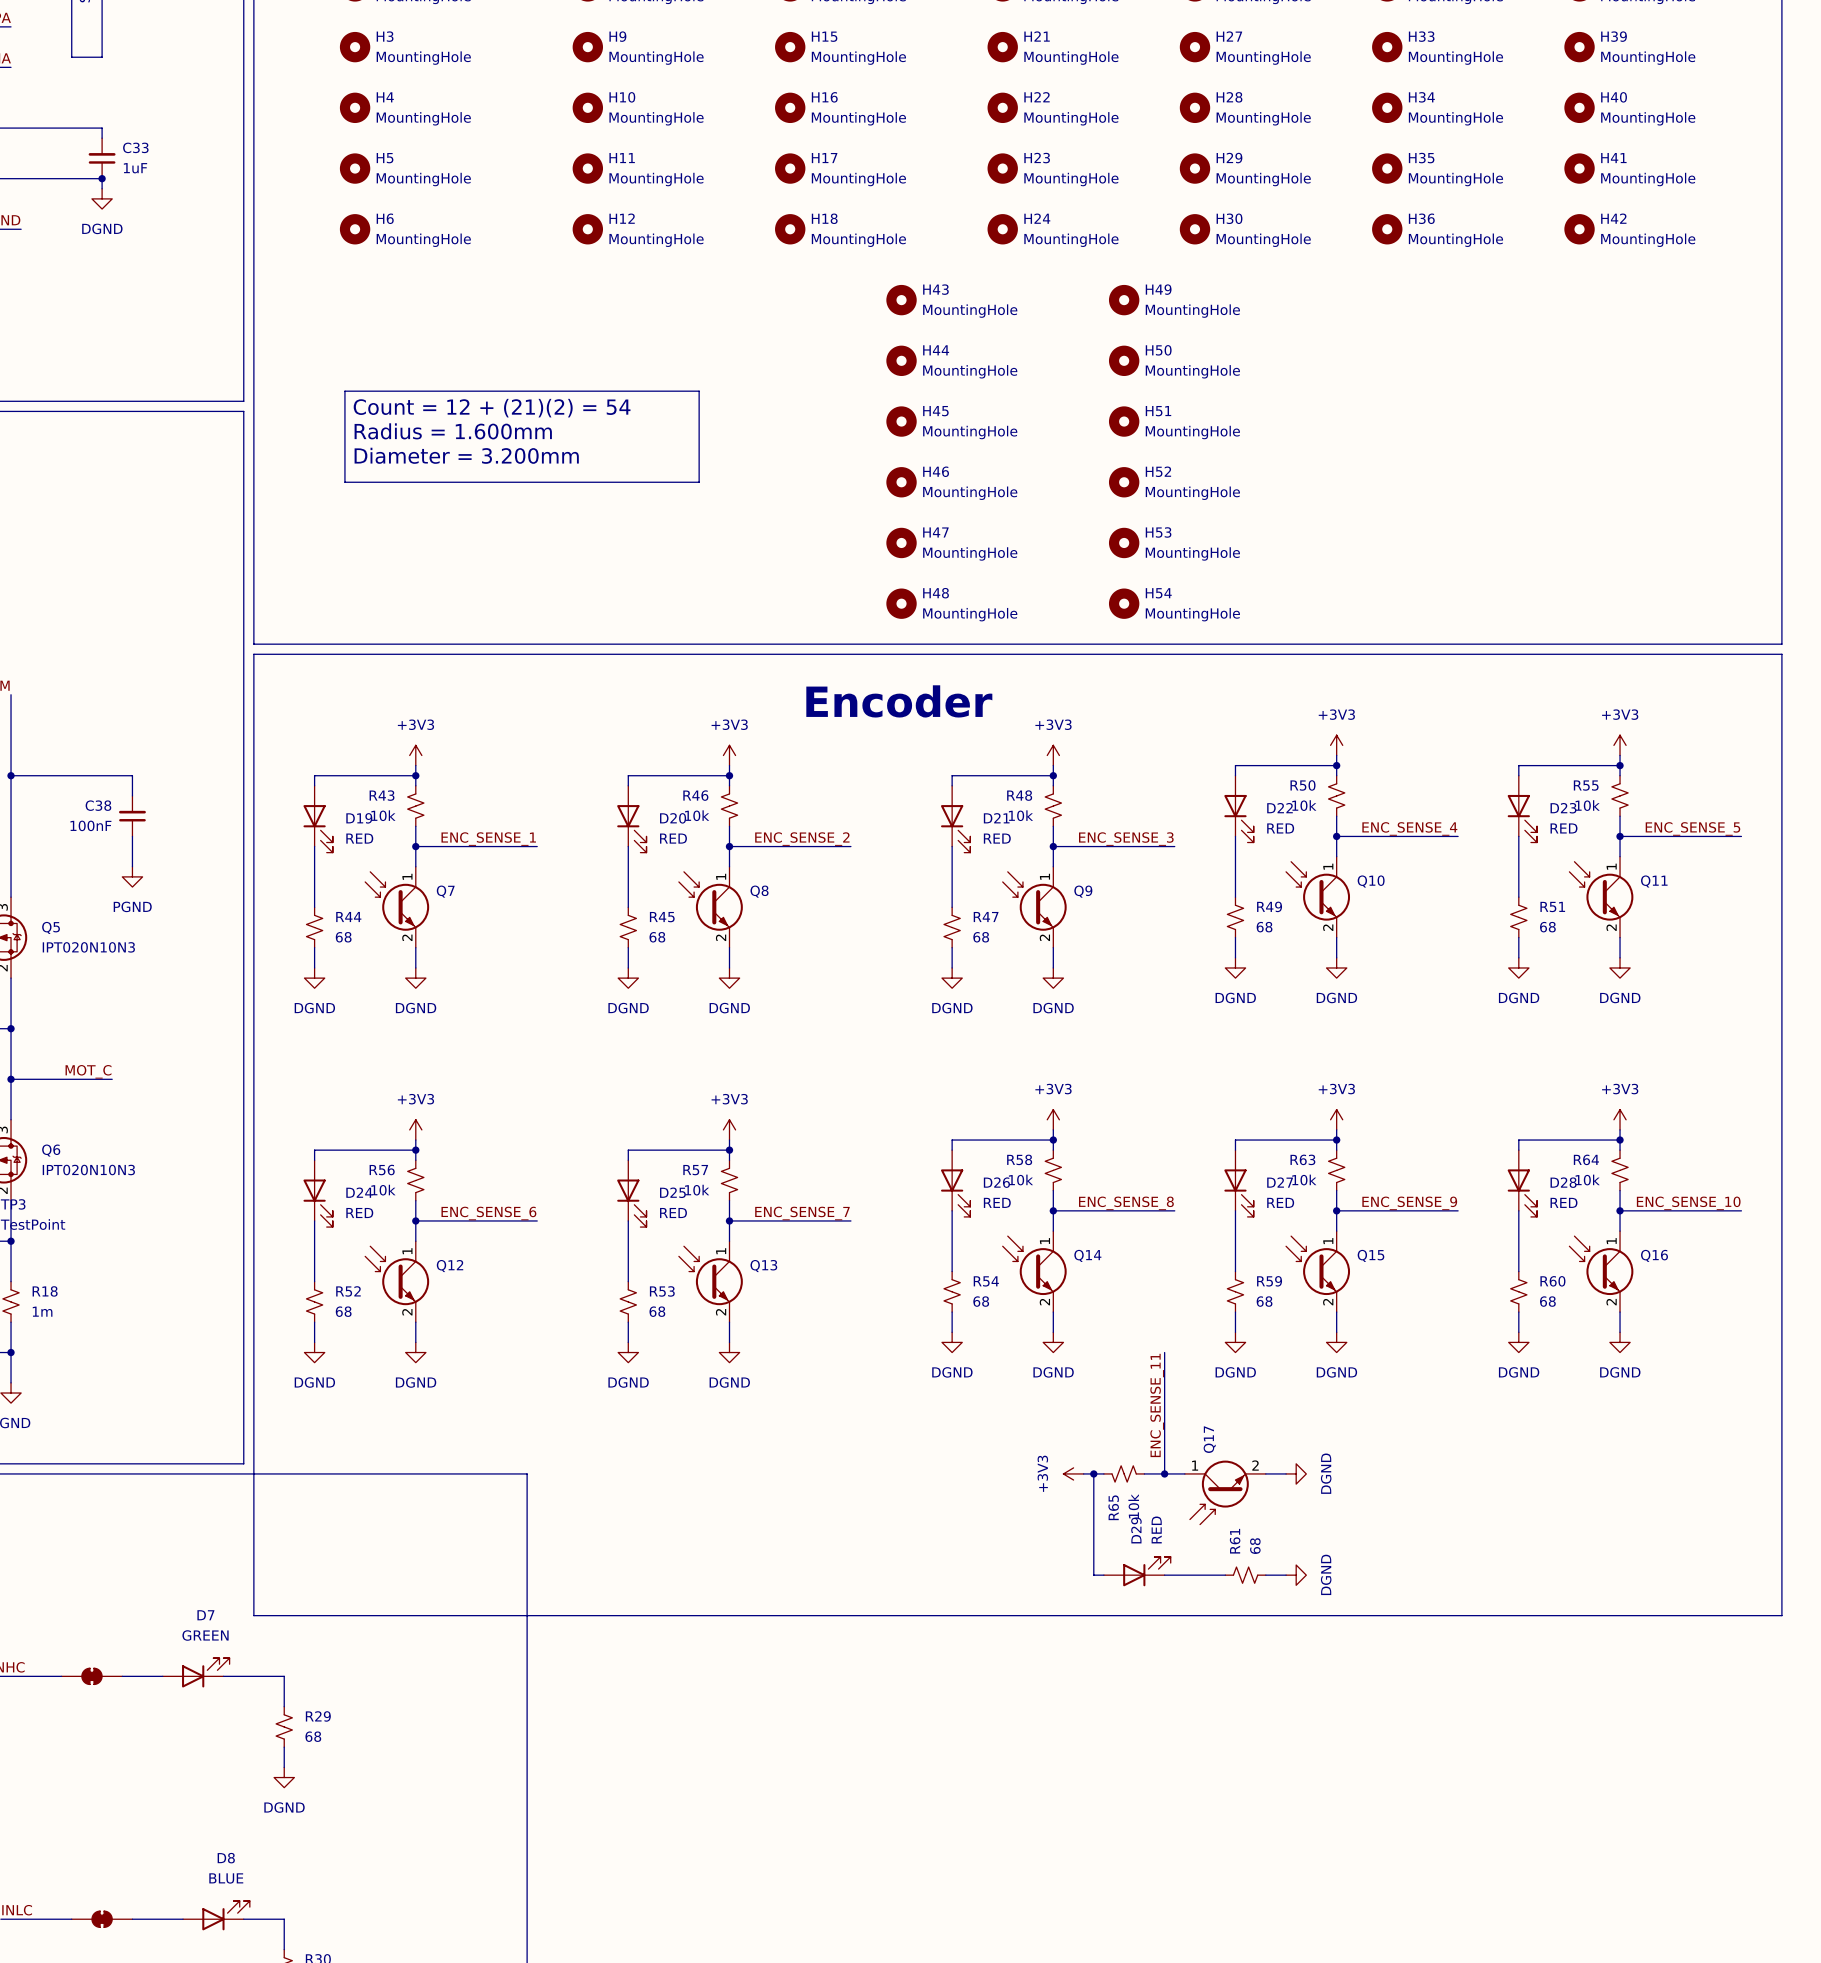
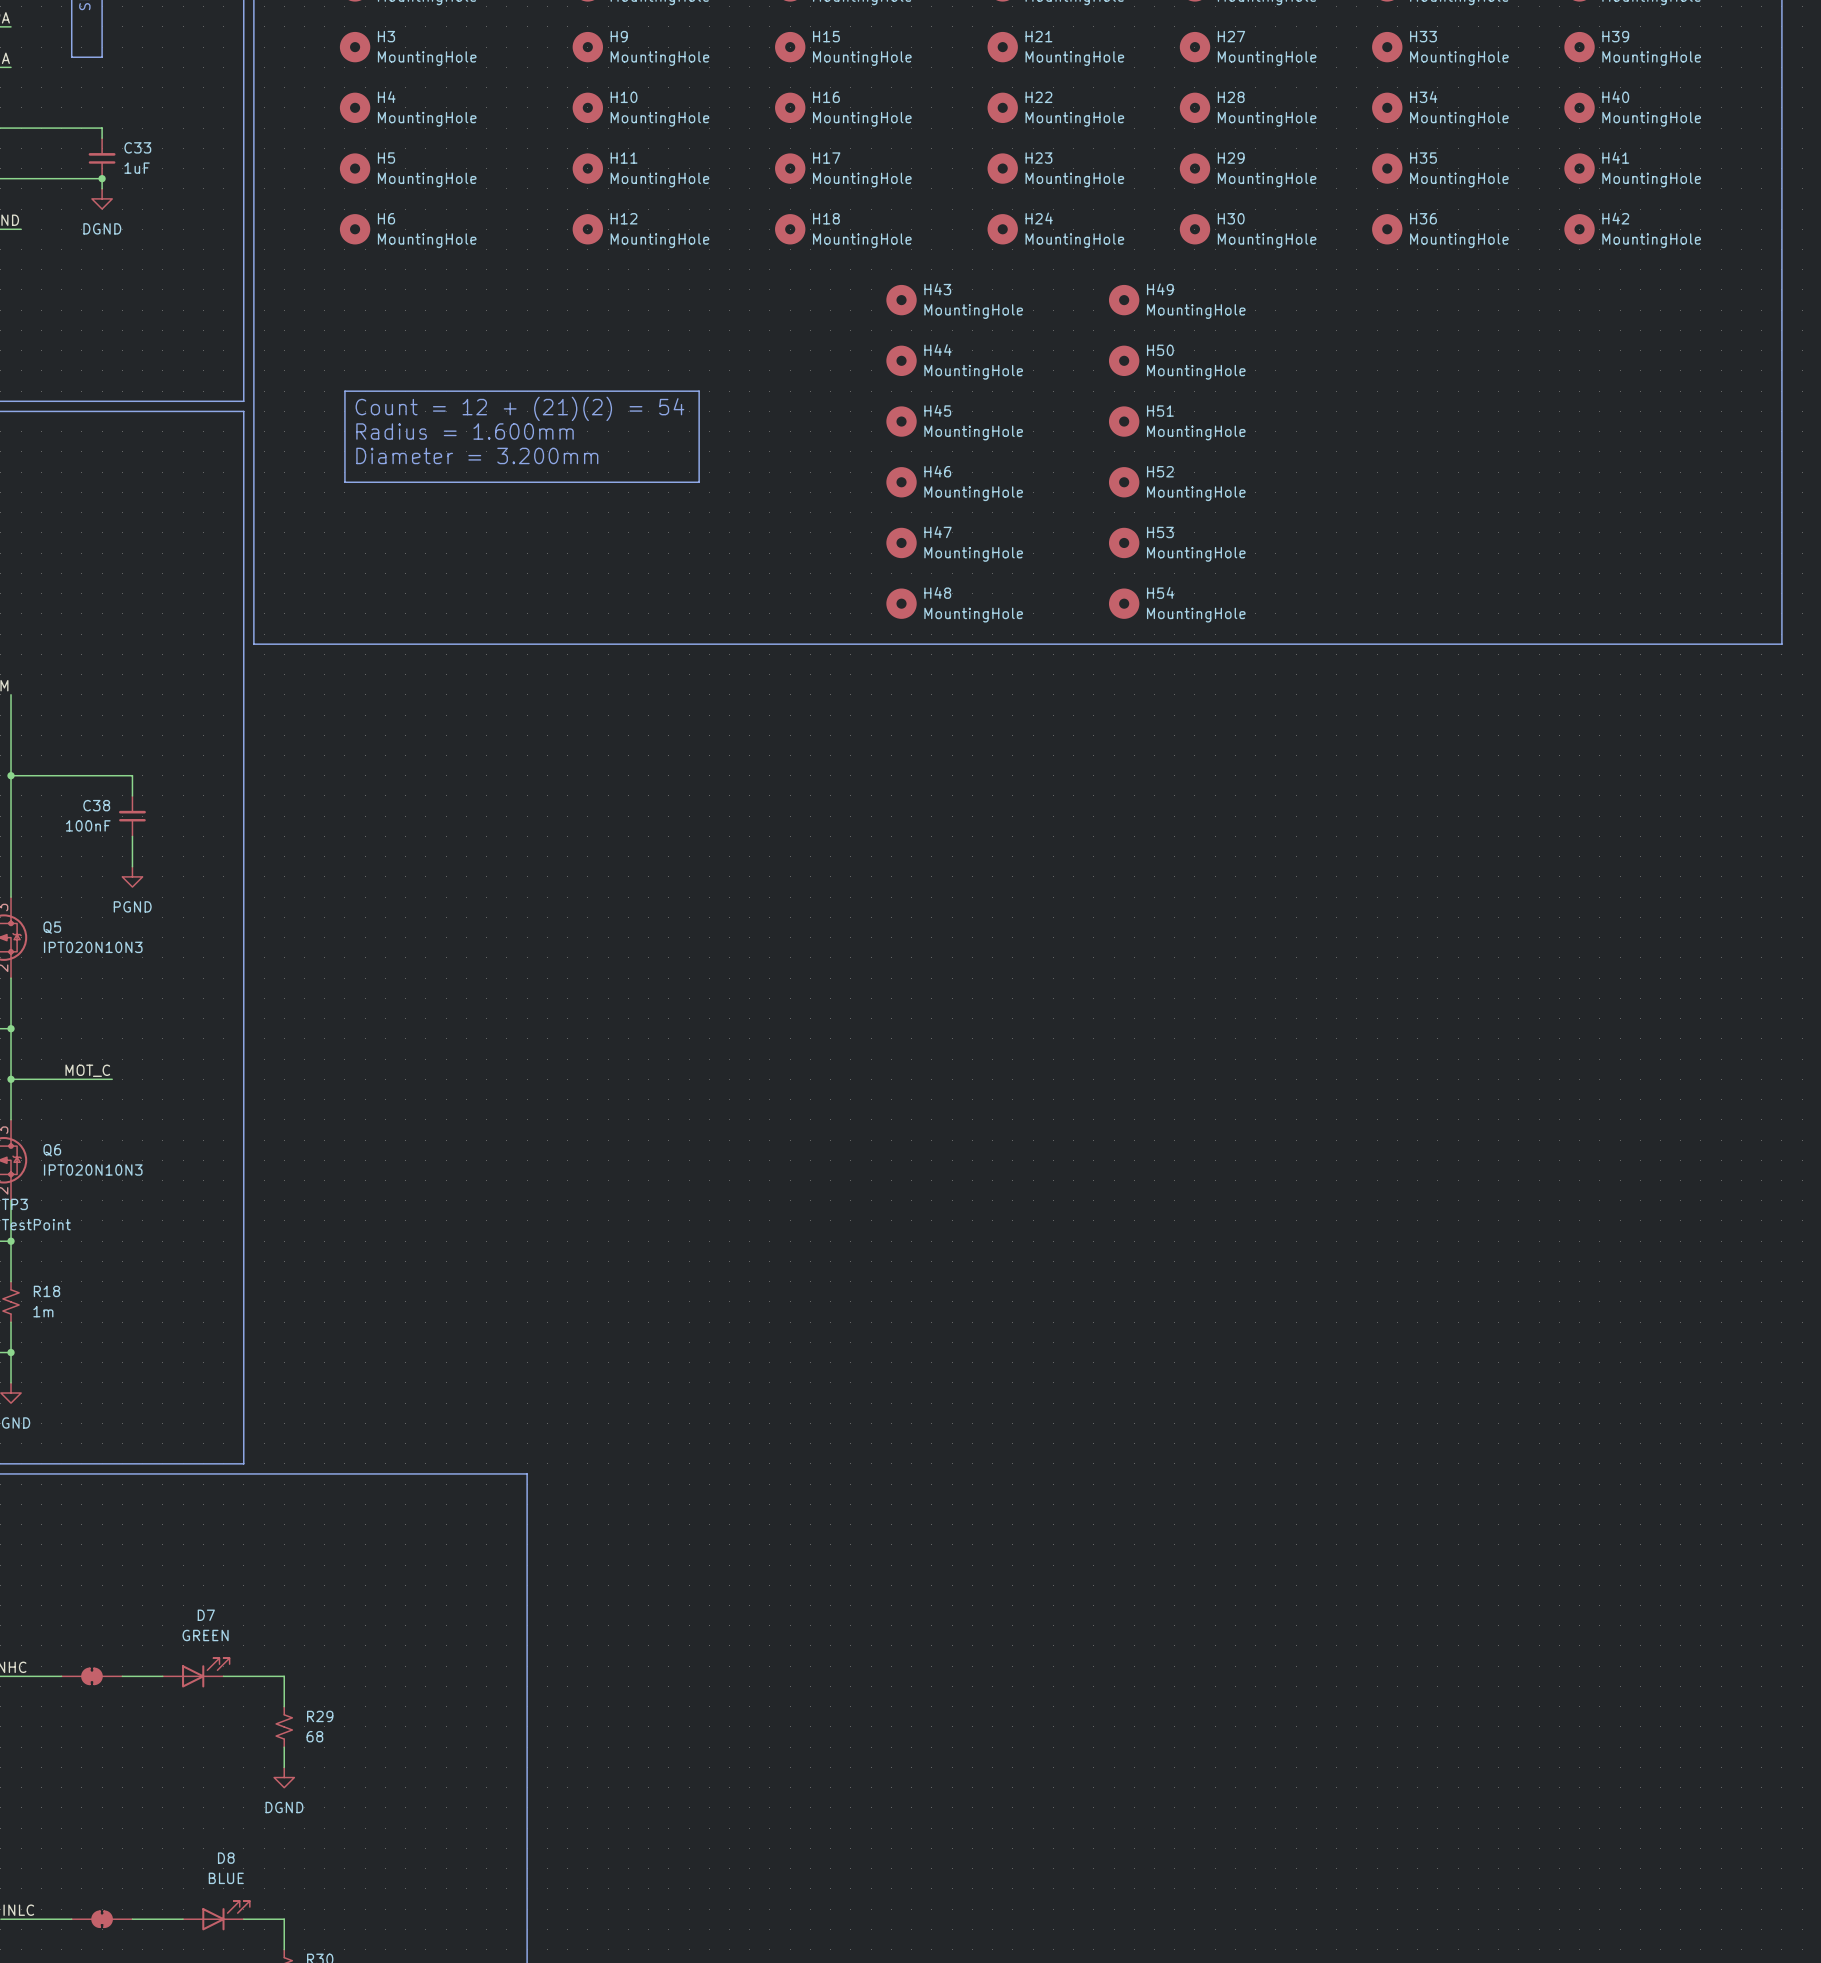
line: (253, 654) (1781, 654) (1781, 1615) (253, 1615) (253, 654) -> none
text: Encoder (899, 701) -> none
power symbol: +3V3 (1336, 745) -> none
power symbol: +3V3 (1620, 745) -> none
power symbol: +3V3 (415, 755) -> none
power symbol: +3V3 (729, 755) -> none
power symbol: +3V3 (1053, 755) -> none
wire: (1336, 755) (1336, 775) -> none
wire: (1620, 755) (1620, 775) -> none
wire: (415, 765) (415, 785) -> none
wire: (729, 765) (729, 785) -> none
wire: (1053, 765) (1053, 785) -> none
wire: (1336, 765) (1235, 765) (1235, 775) -> none
junction: (1336, 765) -> none
wire: (1620, 765) (1518, 765) (1518, 775) -> none
junction: (1620, 765) -> none
wire: (415, 775) (314, 775) (314, 785) -> none
junction: (415, 775) -> none
wire: (729, 775) (628, 775) (628, 785) -> none
junction: (729, 775) -> none
wire: (1053, 775) (952, 775) (952, 785) -> none
junction: (1053, 775) -> none
R50: 10k (1336, 795) -> none
R55: 10k (1620, 795) -> none
R43: 10k (415, 806) -> none
R46: 10k (729, 806) -> none
R48: 10k (1053, 806) -> none
D22: RED (1239, 809) -> none
D23: RED (1522, 809) -> none
wire: (1336, 816) (1336, 856) -> none
wire: (1620, 816) (1620, 856) -> none
D19: RED (318, 819) -> none
D20: RED (631, 819) -> none
D21: RED (955, 819) -> none
wire: (415, 826) (415, 866) -> none
wire: (729, 826) (729, 866) -> none
wire: (1053, 826) (1053, 866) -> none
label: ENC_SENSE_4 (1409, 828) -> none
label: ENC_SENSE_5 (1692, 828) -> none
wire: (1235, 836) (1235, 897) -> none
wire: (1336, 836) (1458, 836) -> none
junction: (1336, 836) -> none
wire: (1518, 836) (1518, 897) -> none
wire: (1620, 836) (1741, 836) -> none
junction: (1620, 836) -> none
label: ENC_SENSE_1 (488, 839) -> none
label: ENC_SENSE_2 (802, 839) -> none
label: ENC_SENSE_3 (1126, 839) -> none
wire: (314, 846) (314, 907) -> none
wire: (415, 846) (537, 846) -> none
junction: (415, 846) -> none
wire: (628, 846) (628, 907) -> none
wire: (729, 846) (850, 846) -> none
junction: (729, 846) -> none
wire: (952, 846) (952, 907) -> none
wire: (1053, 846) (1174, 846) -> none
junction: (1053, 846) -> none
Q10: (1318, 897) -> none
Q11: (1601, 897) -> none
Q7: (397, 907) -> none
Q8: (710, 907) -> none
Q9: (1034, 907) -> none
R49: 68 (1235, 917) -> none
R51: 68 (1518, 917) -> none
R44: 68 (314, 927) -> none
R45: 68 (628, 927) -> none
R47: 68 (952, 927) -> none
wire: (1235, 937) (1235, 957) -> none
wire: (1336, 937) (1336, 957) -> none
wire: (1518, 937) (1518, 957) -> none
wire: (1620, 937) (1620, 957) -> none
wire: (314, 947) (314, 967) -> none
wire: (415, 947) (415, 967) -> none
wire: (628, 947) (628, 967) -> none
wire: (729, 947) (729, 967) -> none
wire: (952, 947) (952, 967) -> none
wire: (1053, 947) (1053, 967) -> none
power symbol: DGND (1235, 967) -> none
power symbol: DGND (1336, 967) -> none
power symbol: DGND (1518, 967) -> none
power symbol: DGND (1620, 967) -> none
power symbol: DGND (314, 978) -> none
power symbol: DGND (415, 978) -> none
power symbol: DGND (628, 978) -> none
power symbol: DGND (729, 978) -> none
power symbol: DGND (952, 978) -> none
power symbol: DGND (1053, 978) -> none
power symbol: +3V3 (1053, 1119) -> none
power symbol: +3V3 (1336, 1119) -> none
power symbol: +3V3 (1620, 1119) -> none
power symbol: +3V3 (415, 1129) -> none
power symbol: +3V3 (729, 1129) -> none
wire: (1053, 1129) (1053, 1150) -> none
wire: (1336, 1129) (1336, 1150) -> none
wire: (1620, 1129) (1620, 1150) -> none
wire: (415, 1140) (415, 1160) -> none
wire: (729, 1140) (729, 1160) -> none
wire: (1053, 1140) (952, 1140) (952, 1150) -> none
junction: (1053, 1140) -> none
wire: (1336, 1140) (1235, 1140) (1235, 1150) -> none
junction: (1336, 1140) -> none
wire: (1620, 1140) (1518, 1140) (1518, 1150) -> none
junction: (1620, 1140) -> none
wire: (415, 1150) (314, 1150) (314, 1160) -> none
junction: (415, 1150) -> none
wire: (729, 1150) (628, 1150) (628, 1160) -> none
junction: (729, 1150) -> none
R58: 10k (1053, 1170) -> none
R63: 10k (1336, 1170) -> none
R64: 10k (1620, 1170) -> none
R56: 10k (415, 1180) -> none
R57: 10k (729, 1180) -> none
D26: RED (955, 1183) -> none
D27: RED (1239, 1183) -> none
D28: RED (1522, 1183) -> none
wire: (1053, 1190) (1053, 1231) -> none
wire: (1336, 1190) (1336, 1231) -> none
wire: (1620, 1190) (1620, 1231) -> none
D24: RED (318, 1193) -> none
D25: RED (631, 1193) -> none
wire: (415, 1200) (415, 1241) -> none
wire: (729, 1200) (729, 1241) -> none
label: ENC_SENSE_8 (1126, 1203) -> none
label: ENC_SENSE_9 (1409, 1203) -> none
label: ENC_SENSE_10 (1688, 1203) -> none
wire: (952, 1210) (952, 1271) -> none
wire: (1053, 1210) (1174, 1210) -> none
junction: (1053, 1210) -> none
wire: (1235, 1210) (1235, 1271) -> none
wire: (1336, 1210) (1458, 1210) -> none
junction: (1336, 1210) -> none
wire: (1518, 1210) (1518, 1271) -> none
wire: (1620, 1210) (1741, 1210) -> none
junction: (1620, 1210) -> none
label: ENC_SENSE_6 (488, 1213) -> none
label: ENC_SENSE_7 (802, 1213) -> none
wire: (314, 1220) (314, 1281) -> none
wire: (415, 1220) (537, 1220) -> none
junction: (415, 1220) -> none
wire: (628, 1220) (628, 1281) -> none
wire: (729, 1220) (850, 1220) -> none
junction: (729, 1220) -> none
Q14: (1034, 1271) -> none
Q15: (1318, 1271) -> none
Q16: (1601, 1271) -> none
Q12: (397, 1281) -> none
Q13: (710, 1281) -> none
R54: 68 (952, 1291) -> none
R59: 68 (1235, 1291) -> none
R60: 68 (1518, 1291) -> none
R52: 68 (314, 1301) -> none
R53: 68 (628, 1301) -> none
wire: (952, 1312) (952, 1332) -> none
wire: (1053, 1312) (1053, 1332) -> none
wire: (1235, 1312) (1235, 1332) -> none
wire: (1336, 1312) (1336, 1332) -> none
wire: (1518, 1312) (1518, 1332) -> none
wire: (1620, 1312) (1620, 1332) -> none
wire: (314, 1322) (314, 1342) -> none
wire: (415, 1322) (415, 1342) -> none
wire: (628, 1322) (628, 1342) -> none
wire: (729, 1322) (729, 1342) -> none
power symbol: DGND (952, 1342) -> none
power symbol: DGND (1053, 1342) -> none
power symbol: DGND (1235, 1342) -> none
power symbol: DGND (1336, 1342) -> none
power symbol: DGND (1518, 1342) -> none
power symbol: DGND (1620, 1342) -> none
power symbol: DGND (314, 1352) -> none
power symbol: DGND (415, 1352) -> none
power symbol: DGND (628, 1352) -> none
power symbol: DGND (729, 1352) -> none
wire: (1164, 1352) (1164, 1473) -> none
label: ENC_SENSE_11 (1157, 1405) -> none
power symbol: +3V3 (1073, 1473) -> none
wire: (1083, 1473) (1103, 1473) -> none
wire: (1093, 1473) (1093, 1575) (1103, 1575) -> none
junction: (1093, 1473) -> none
R65: 10k (1124, 1473) -> none
wire: (1144, 1473) (1184, 1473) -> none
junction: (1164, 1473) -> none
wire: (1265, 1473) (1286, 1473) -> none
power symbol: DGND (1296, 1473) -> none
Q17: (1225, 1492) -> none
D29: RED (1137, 1571) -> none
wire: (1164, 1575) (1225, 1575) -> none
R61: 68 (1245, 1575) -> none
wire: (1265, 1575) (1286, 1575) -> none
power symbol: DGND (1296, 1575) -> none

